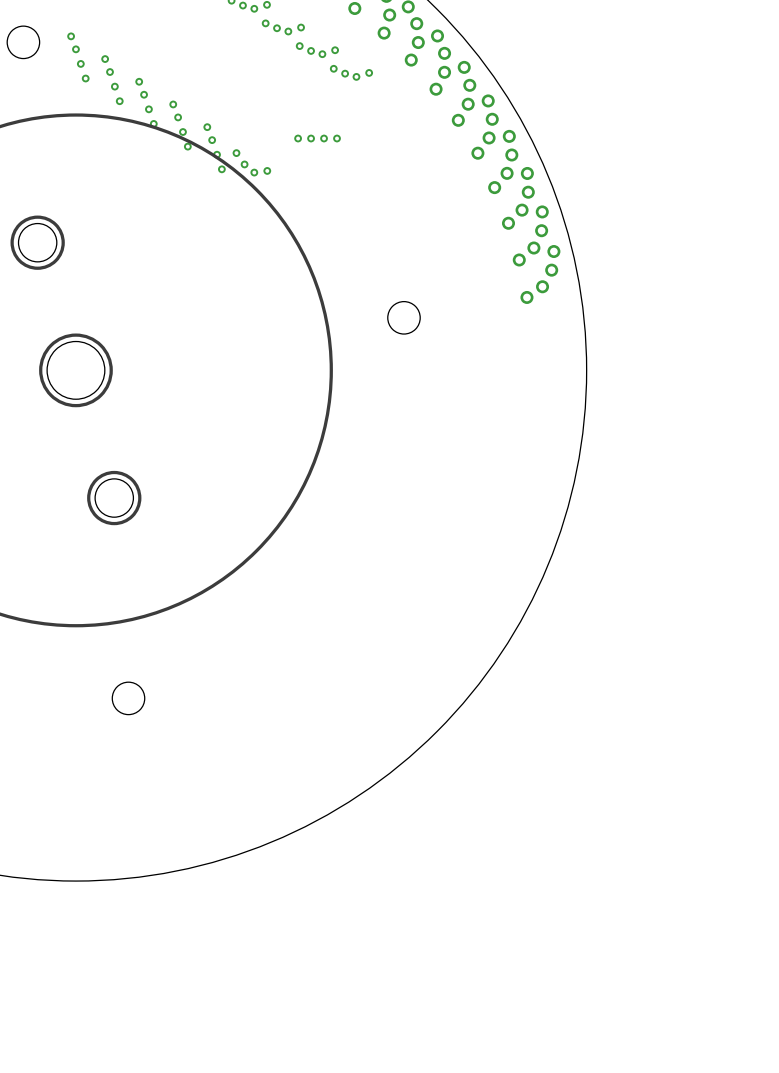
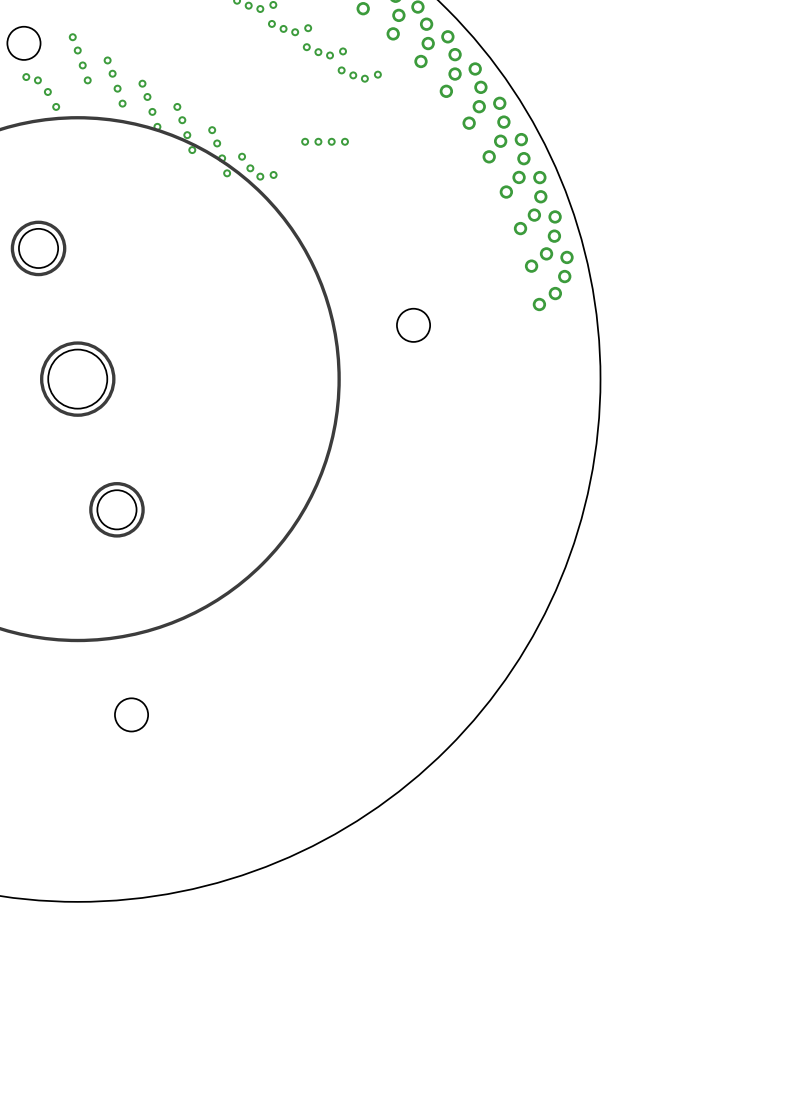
via: none -> (26, 77)
via: none -> (37, 80)
via: none -> (47, 91)
via: none -> (56, 106)

